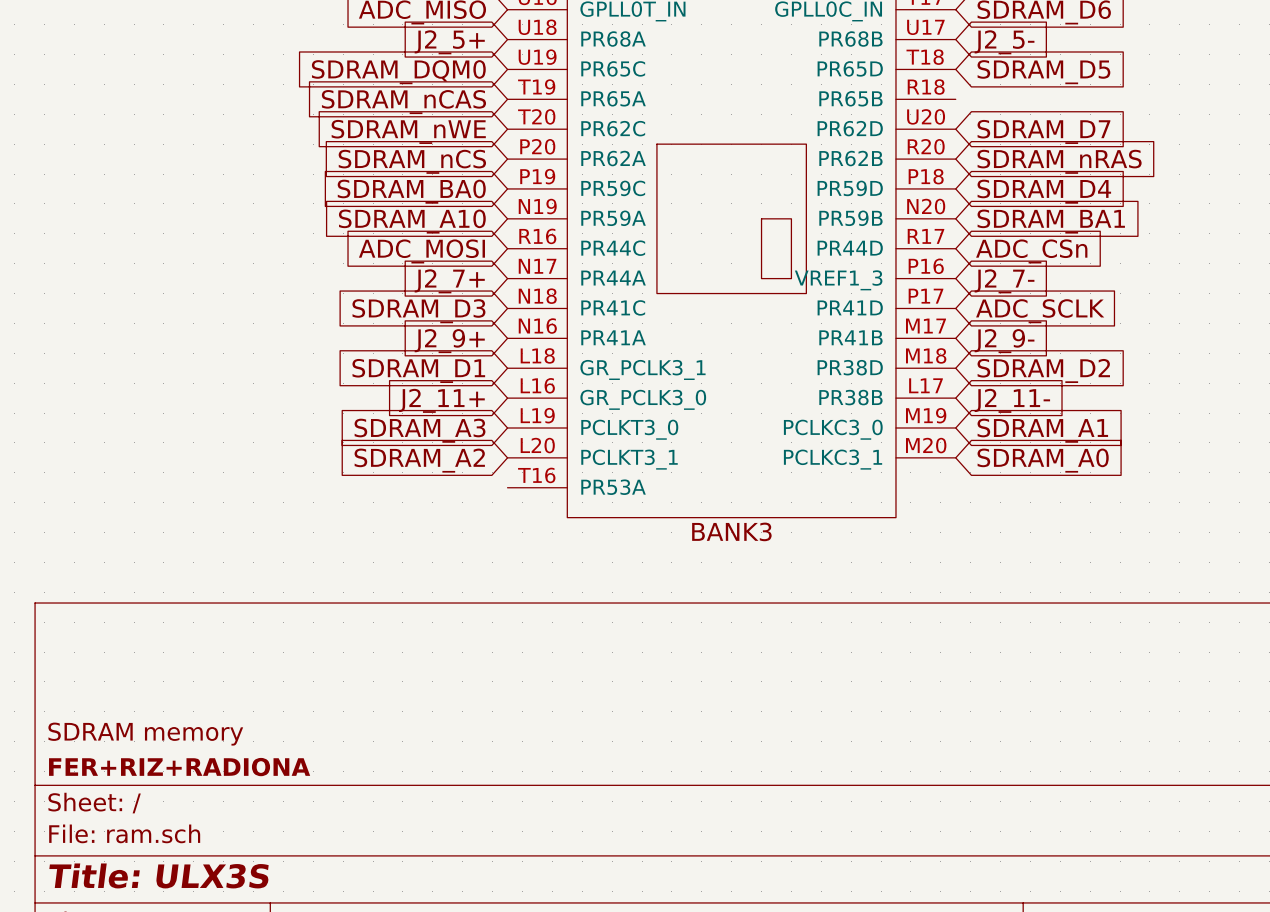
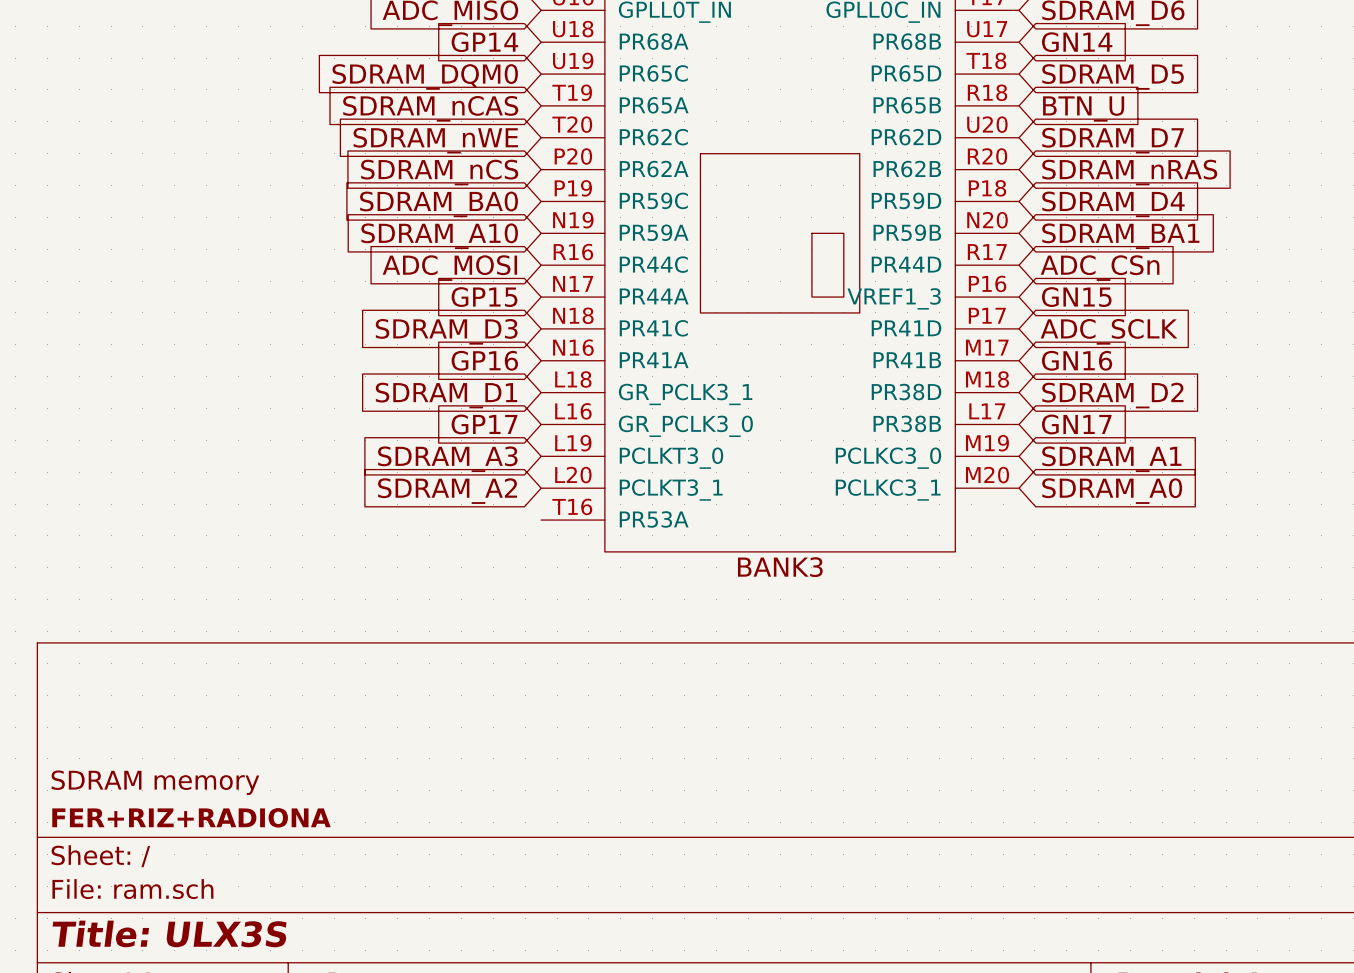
global label: J2_5+ (449, 42) -> GP14 (484, 42)
global label: J2_5- (1004, 42) -> GN14 (1077, 42)
global label: none -> BTN_U (1083, 108)
global label: J2_7+ (449, 281) -> GP15 (484, 297)
global label: J2_7- (1004, 281) -> GN15 (1076, 297)
global label: J2_9+ (449, 341) -> GP16 (484, 360)
global label: J2_9- (1004, 341) -> GN16 (1077, 360)
global label: J2_11+ (441, 400) -> GP17 (484, 424)
global label: J2_11- (1012, 400) -> GN17 (1076, 424)

